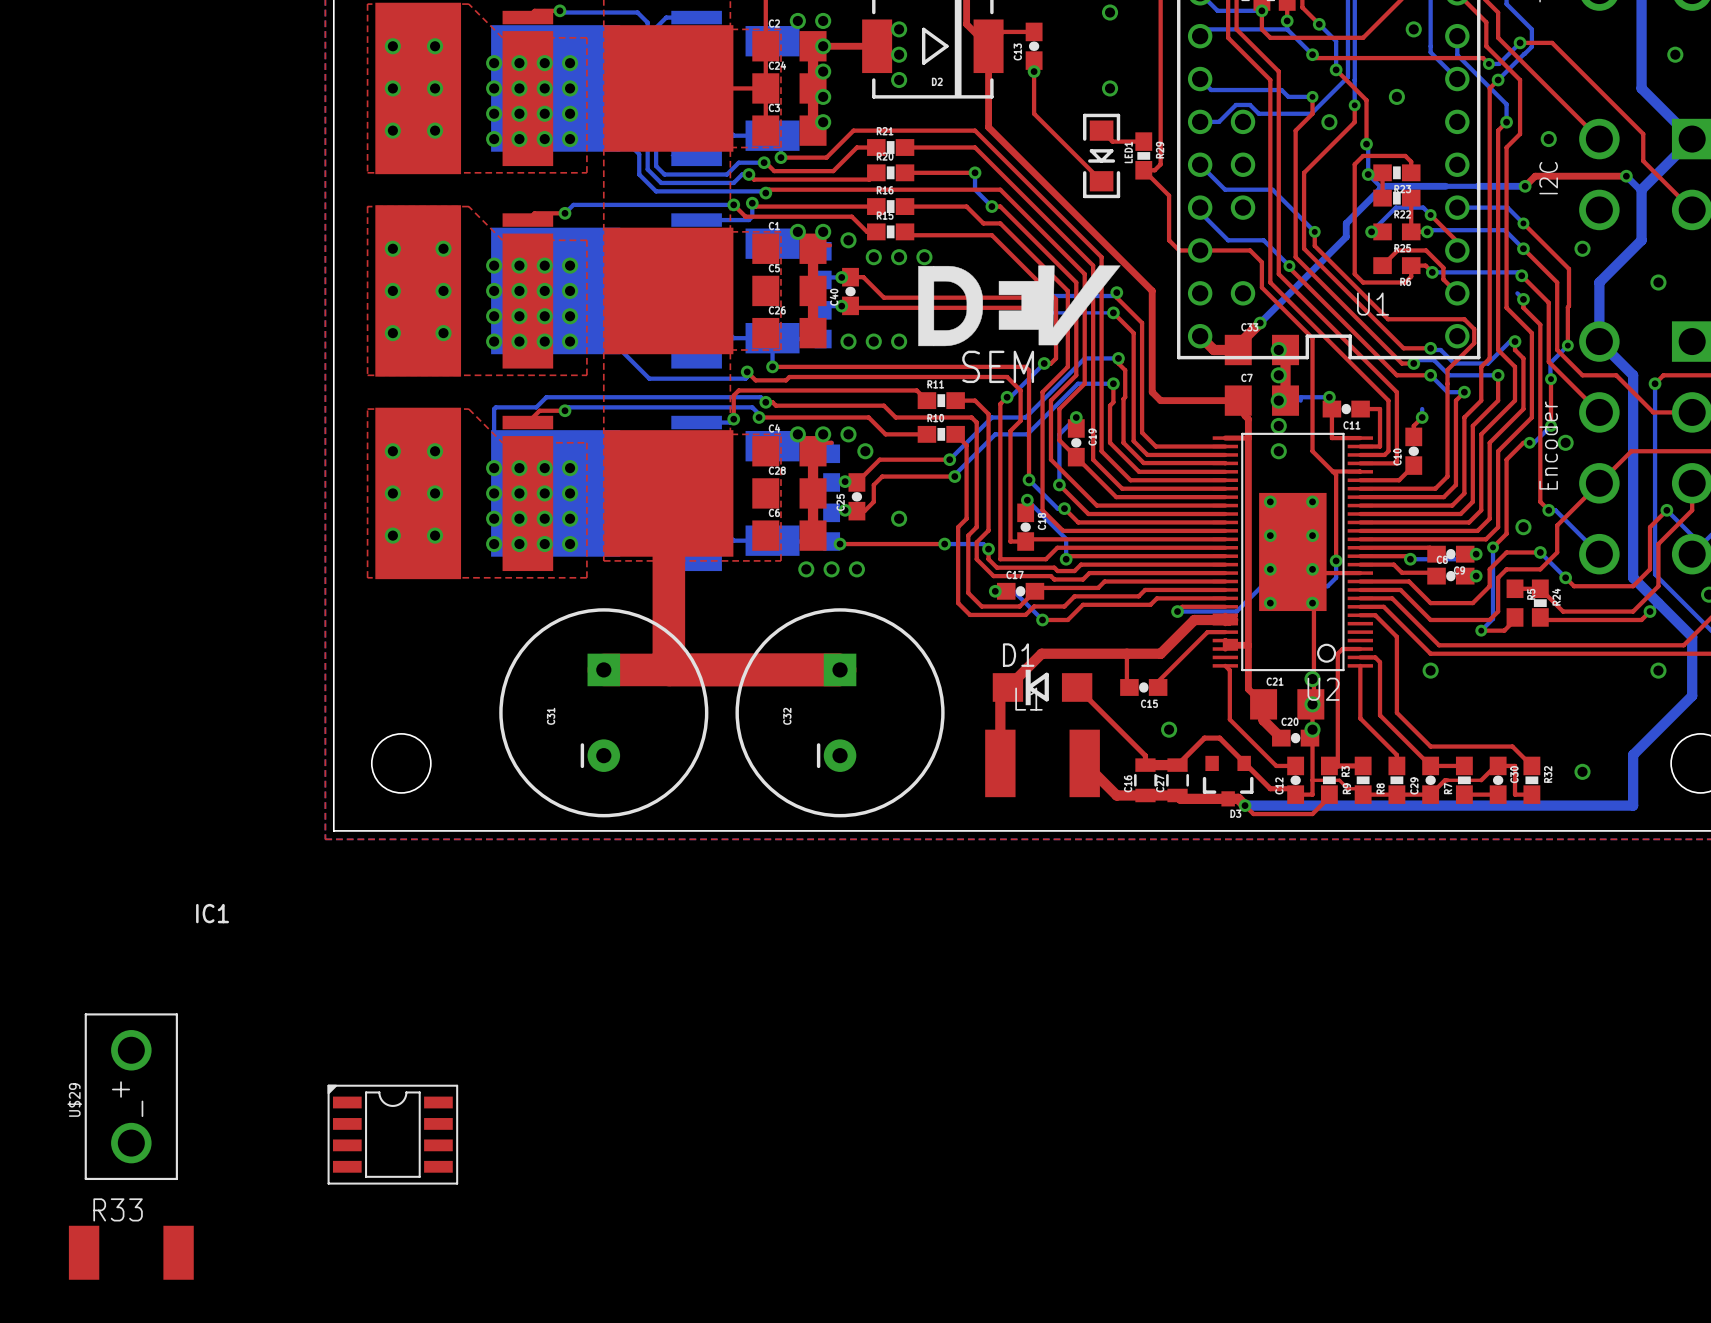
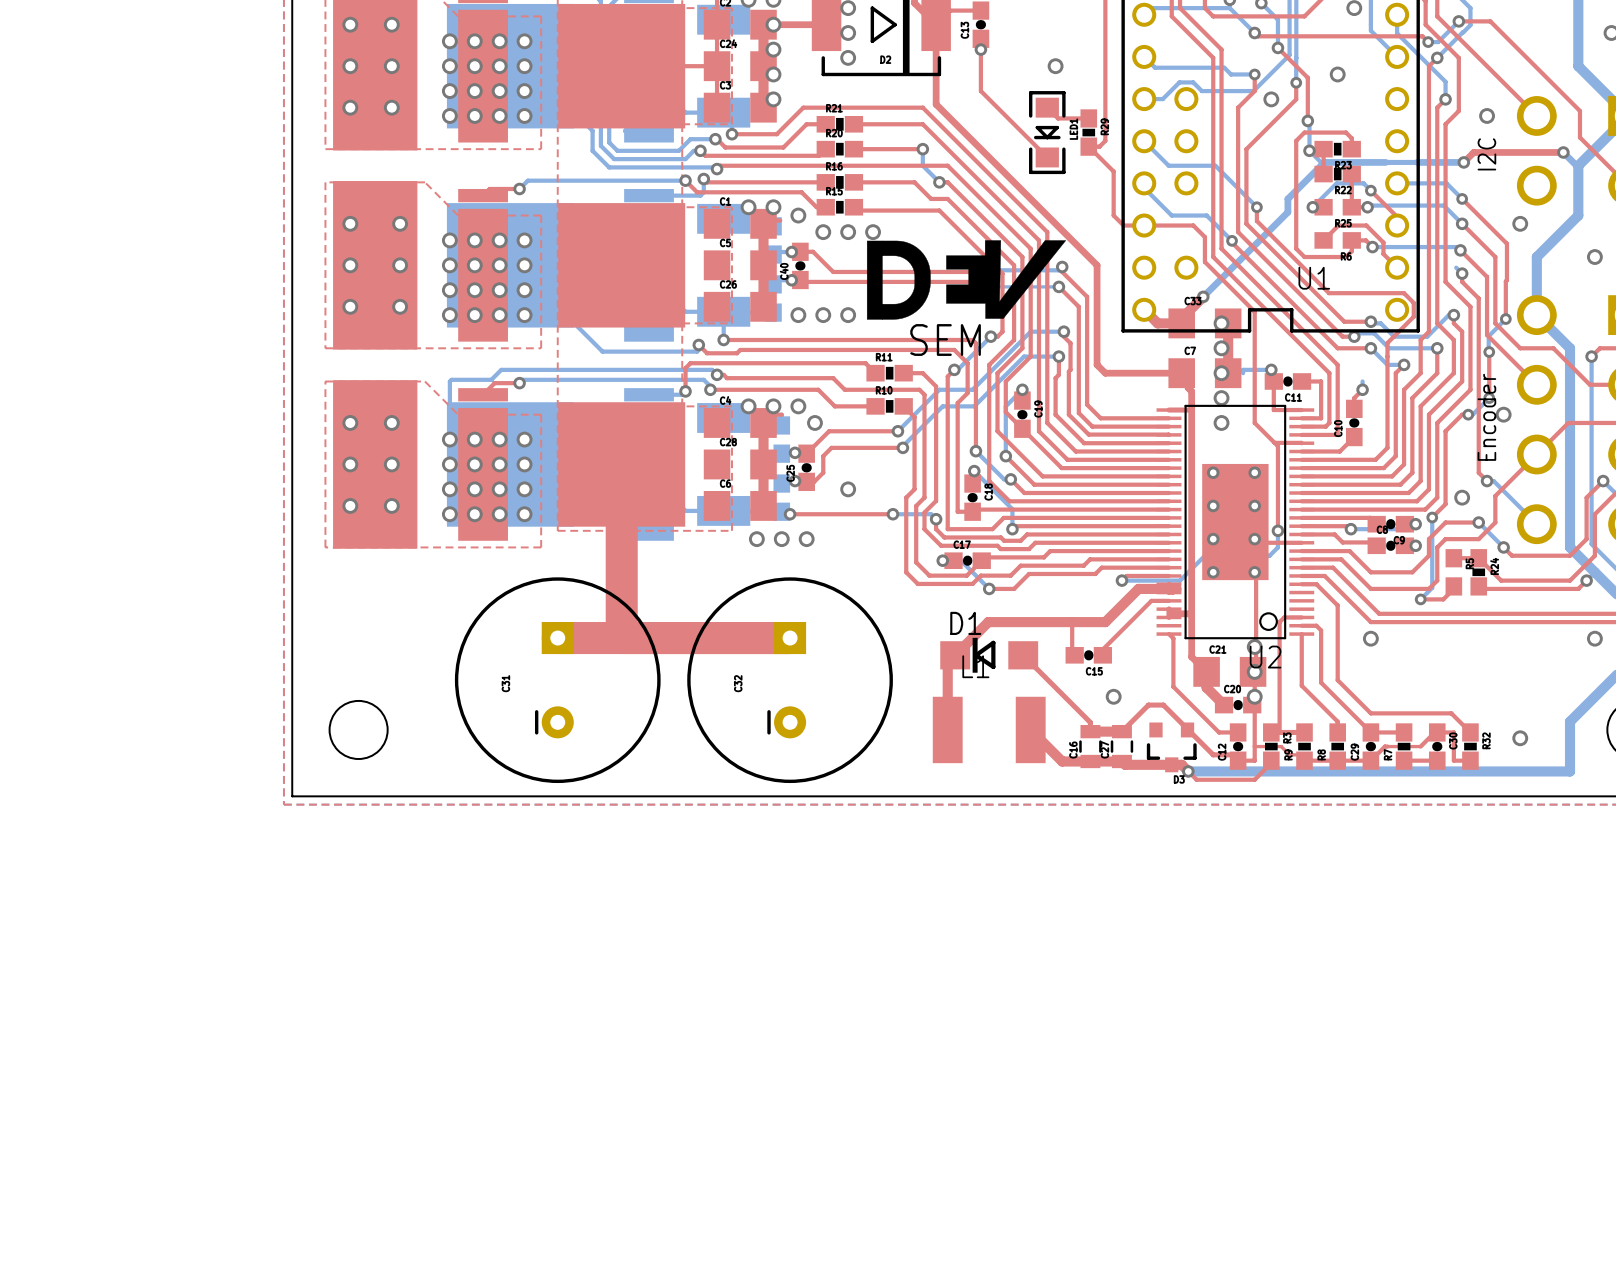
U$29: (131, 1096) -> none
IC1: (392, 1134) -> none
R33: (131, 1252) -> none

